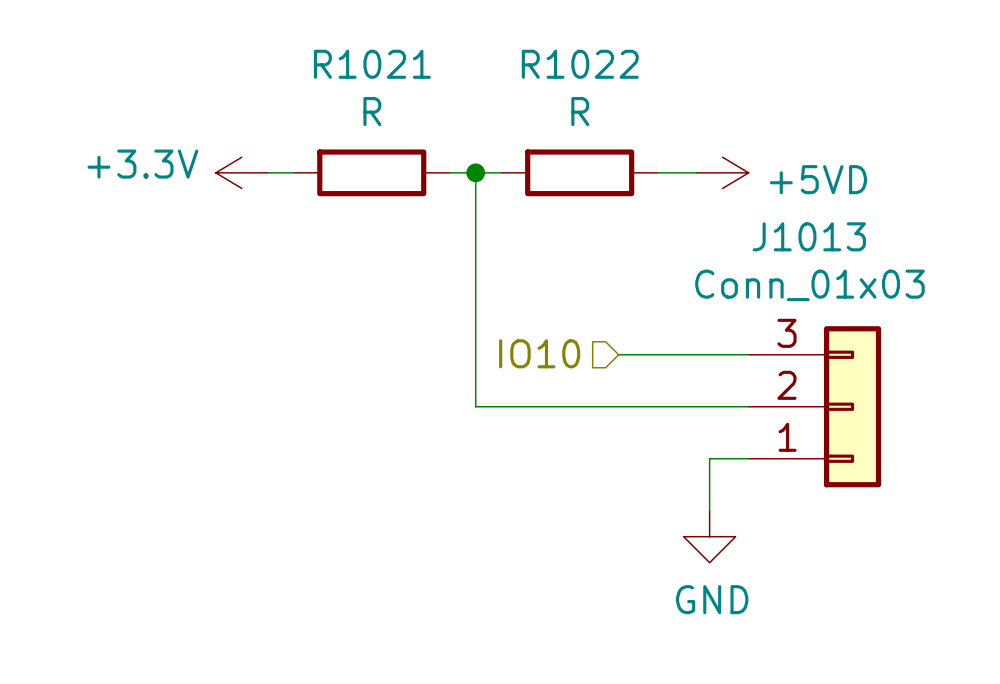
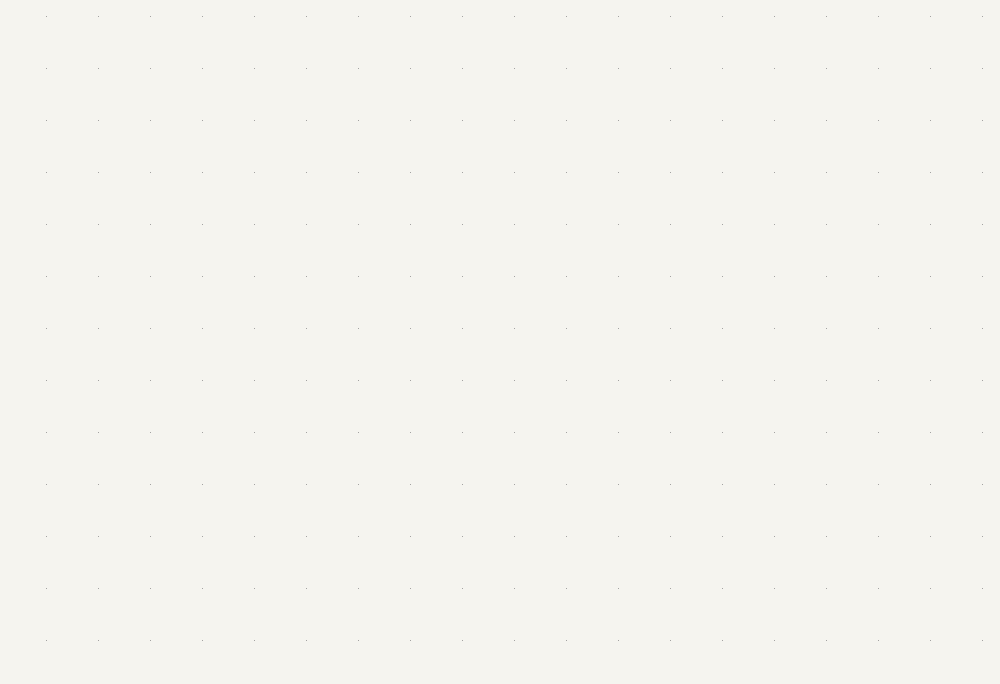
power symbol: +3.3V (241, 172) -> none
wire: (267, 172) (293, 172) -> none
R1021: R (371, 172) -> none
wire: (449, 172) (501, 172) -> none
wire: (475, 172) (475, 406) (748, 406) -> none
junction: (475, 172) -> none
R1022: R (579, 172) -> none
wire: (657, 172) (696, 172) -> none
power symbol: +5VD (722, 172) -> none
hierarchical label: IO10 (539, 353) -> none
wire: (618, 354) (748, 354) -> none
J1013: Conn_01x03 (814, 406) -> none
wire: (748, 458) (709, 458) (709, 510) -> none
power symbol: GND (709, 536) -> none

